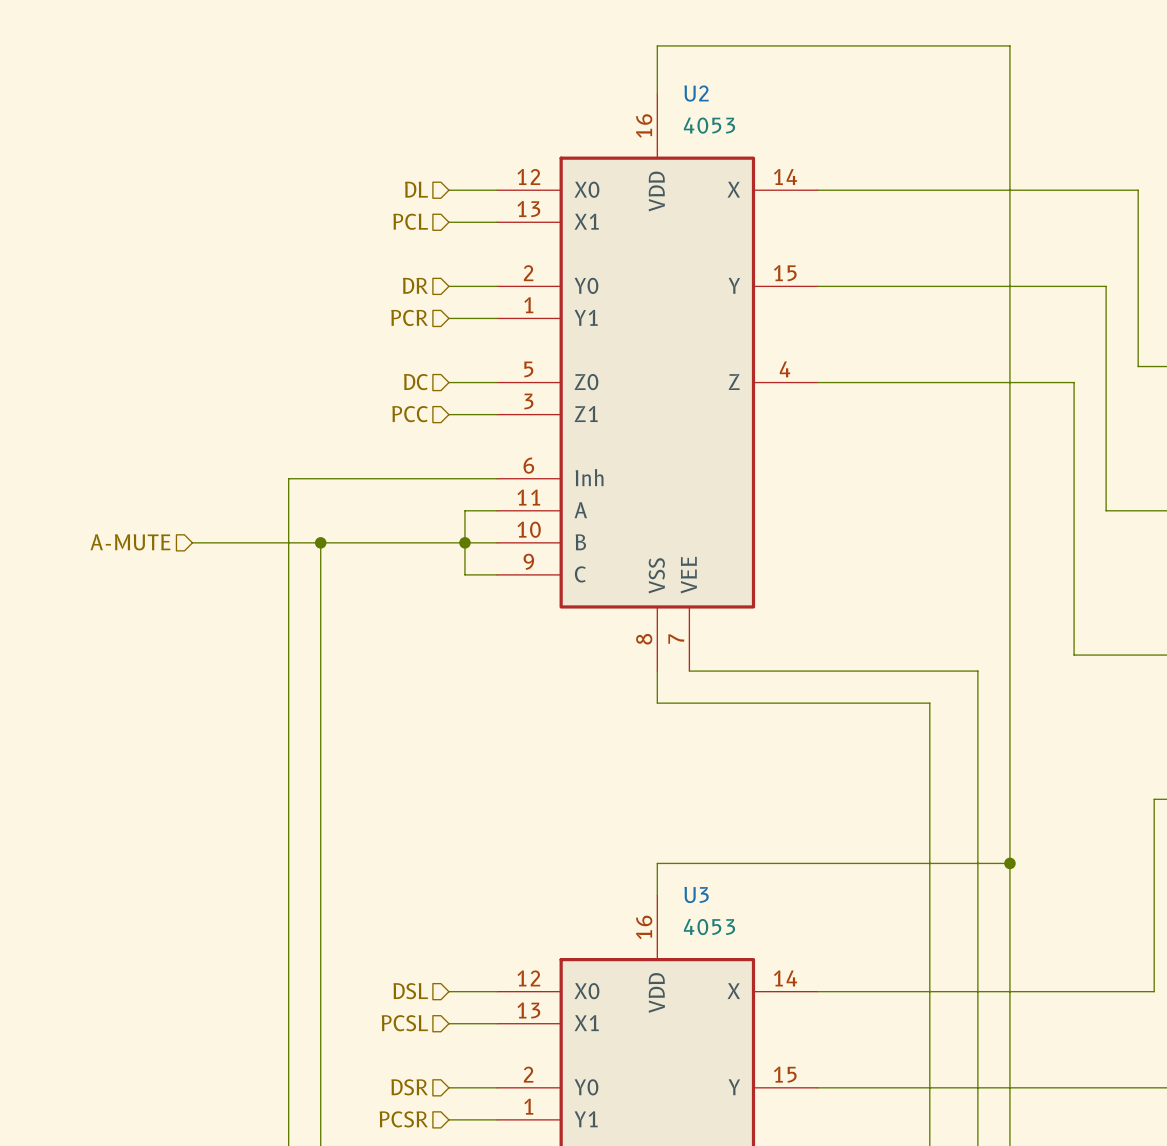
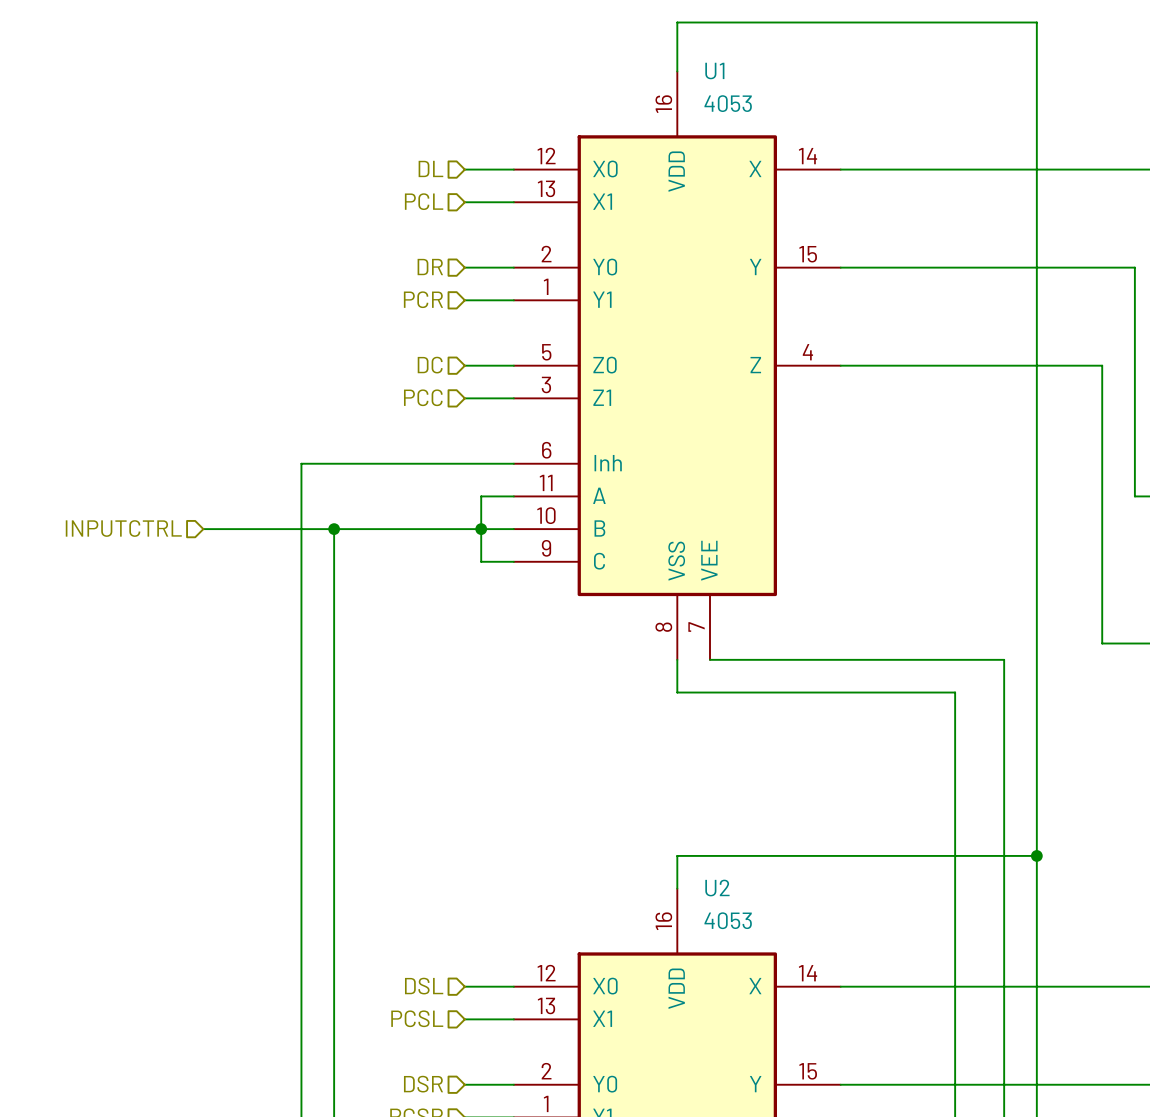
U2 name: U2 (696, 93) -> U1 (714, 71)
hierarchical label: A-MUTE (130, 542) -> INPUTCTRL (123, 528)
U3 name: U3 (696, 894) -> U2 (717, 888)

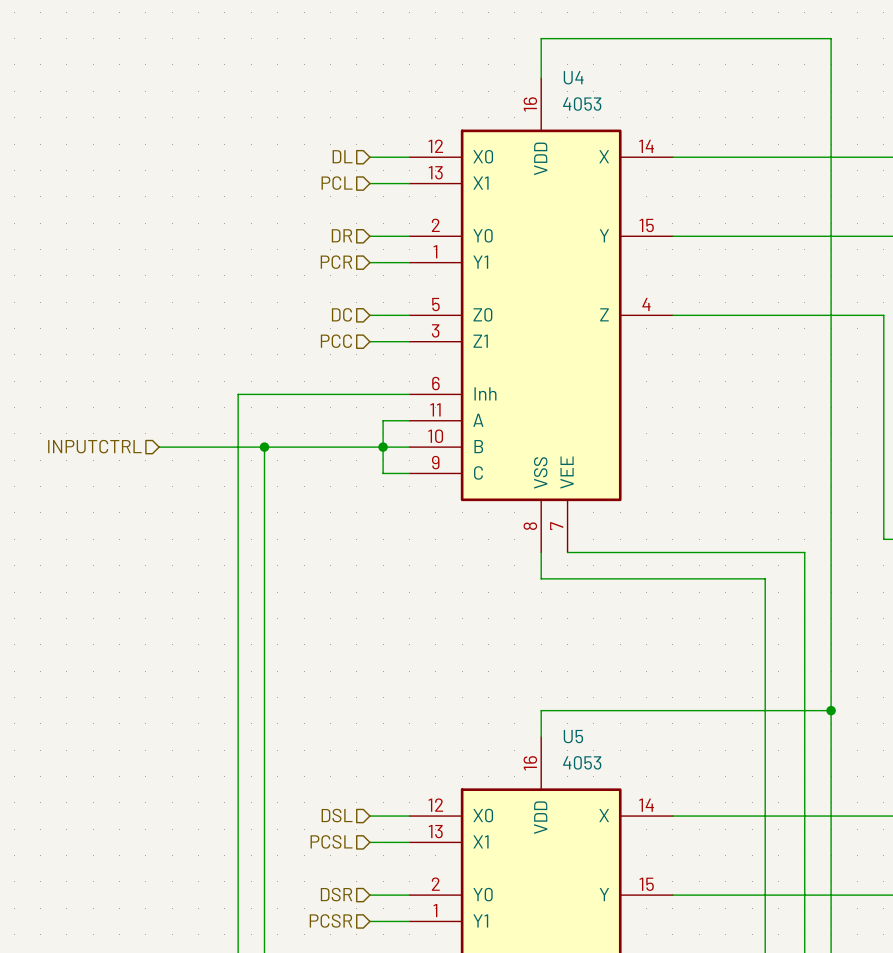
U1 name: U1 (714, 71) -> U4 (573, 77)
U2 name: U2 (717, 888) -> U5 (573, 736)

